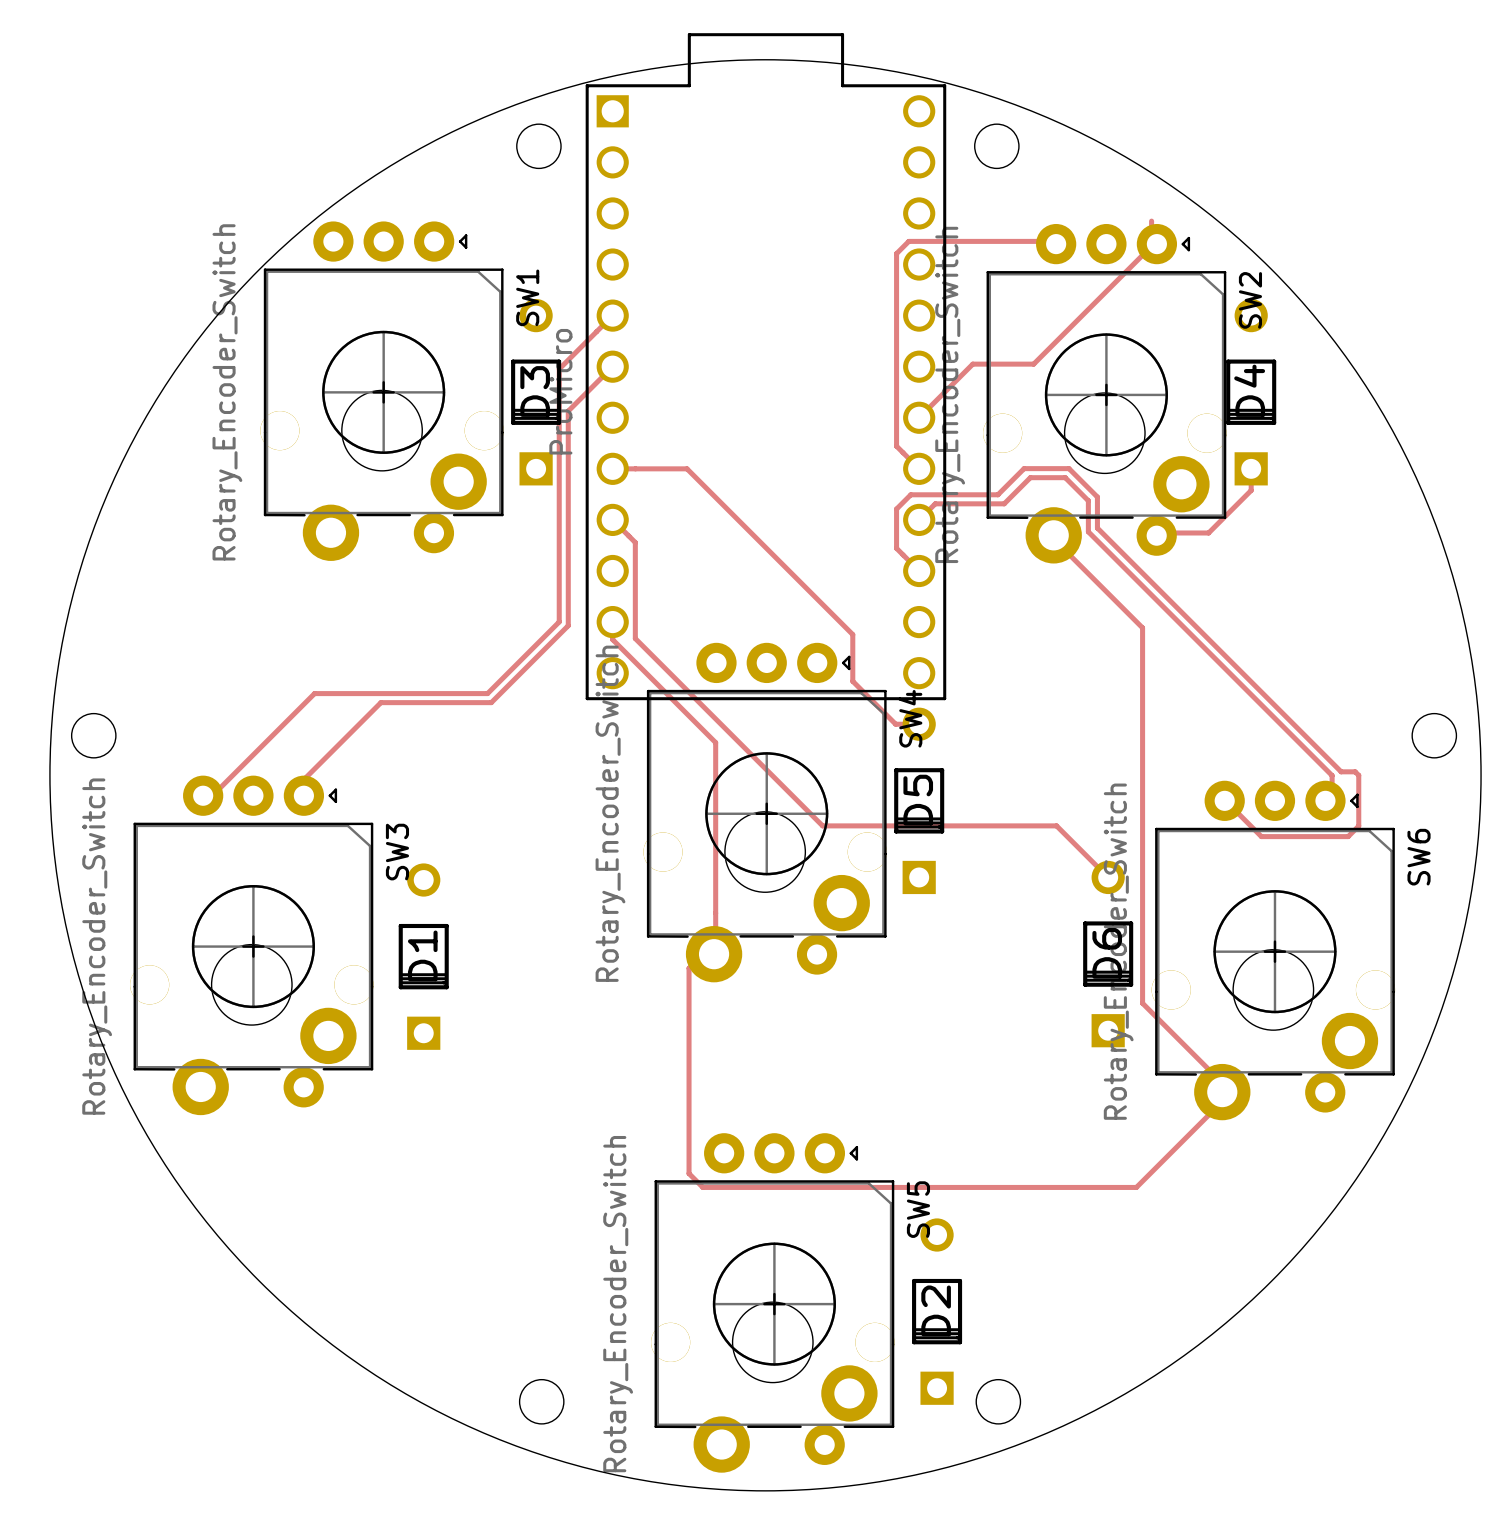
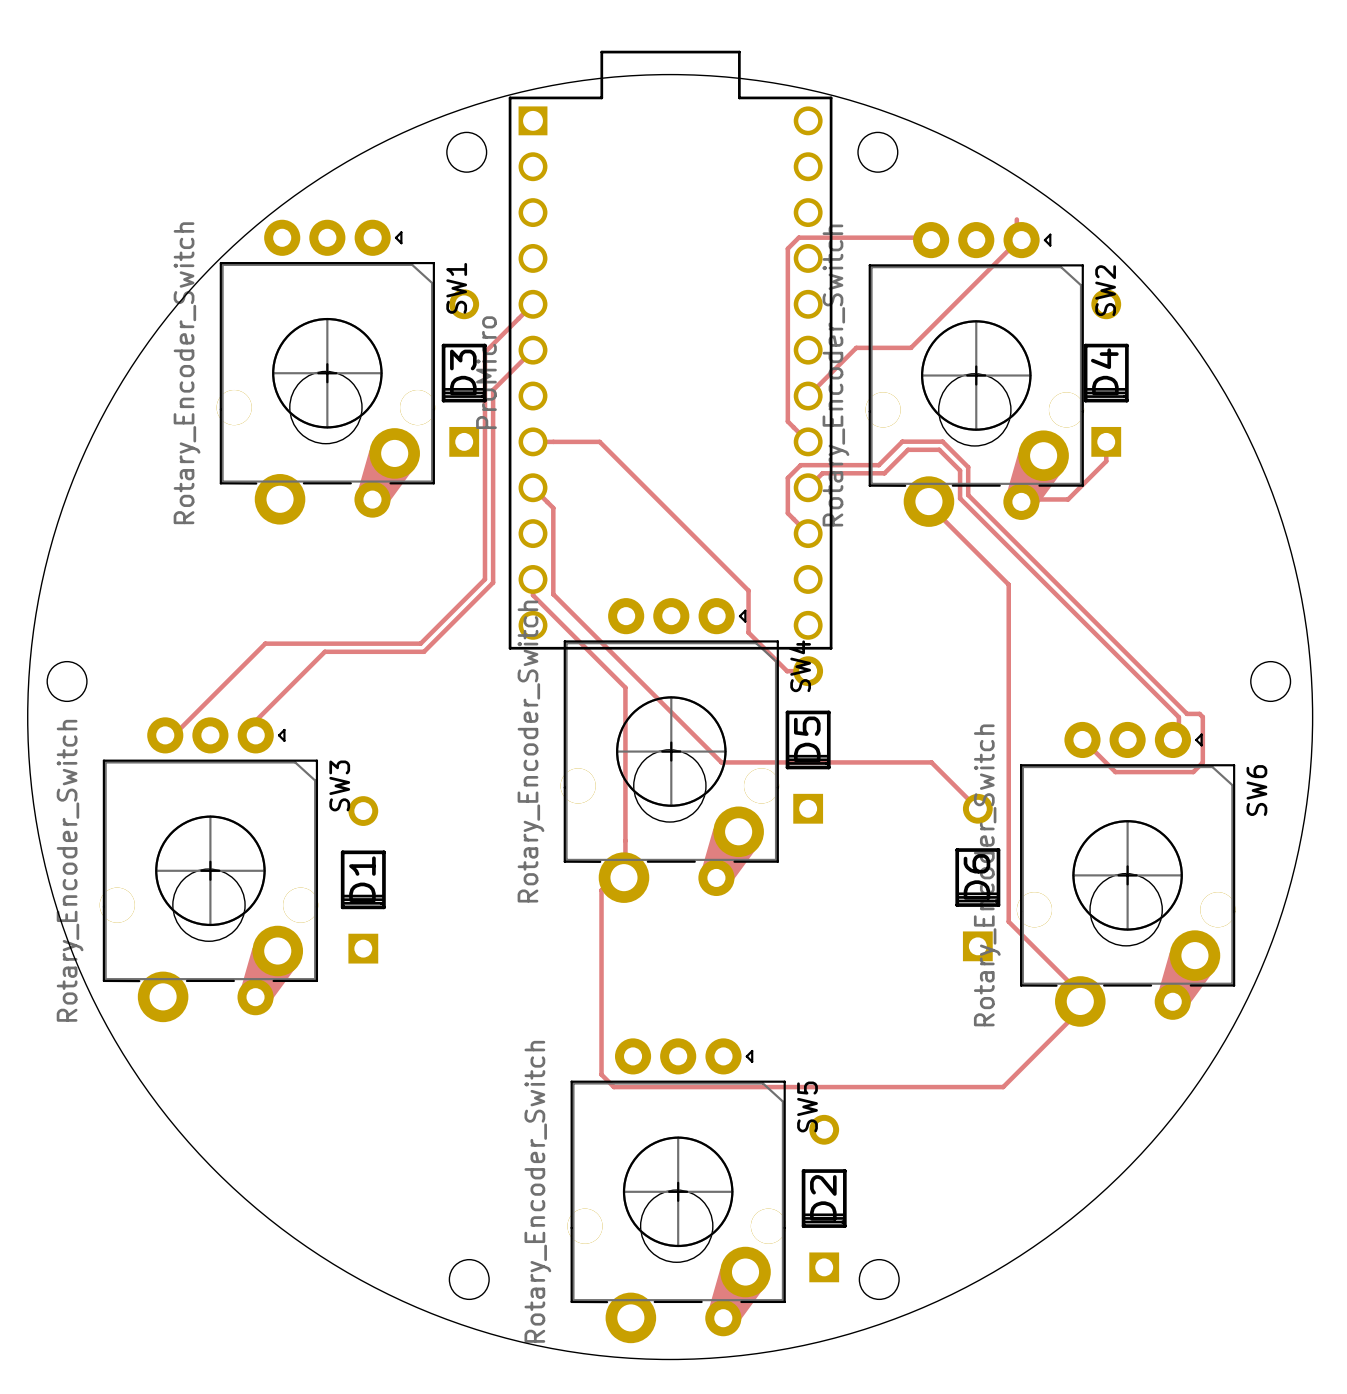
SW1 footprint: [260, 221, 504, 561] -> [216, 219, 436, 525]
SW2 footprint: [983, 223, 1227, 564] -> [865, 222, 1085, 527]
SW4 footprint: [643, 642, 887, 983] -> [560, 598, 780, 903]
SW3 footprint: [130, 775, 374, 1116] -> [99, 717, 319, 1023]
SW6 footprint: [1151, 780, 1396, 1121] -> [1016, 721, 1236, 1027]
SW5 footprint: [651, 1133, 895, 1473] -> [567, 1038, 787, 1344]

